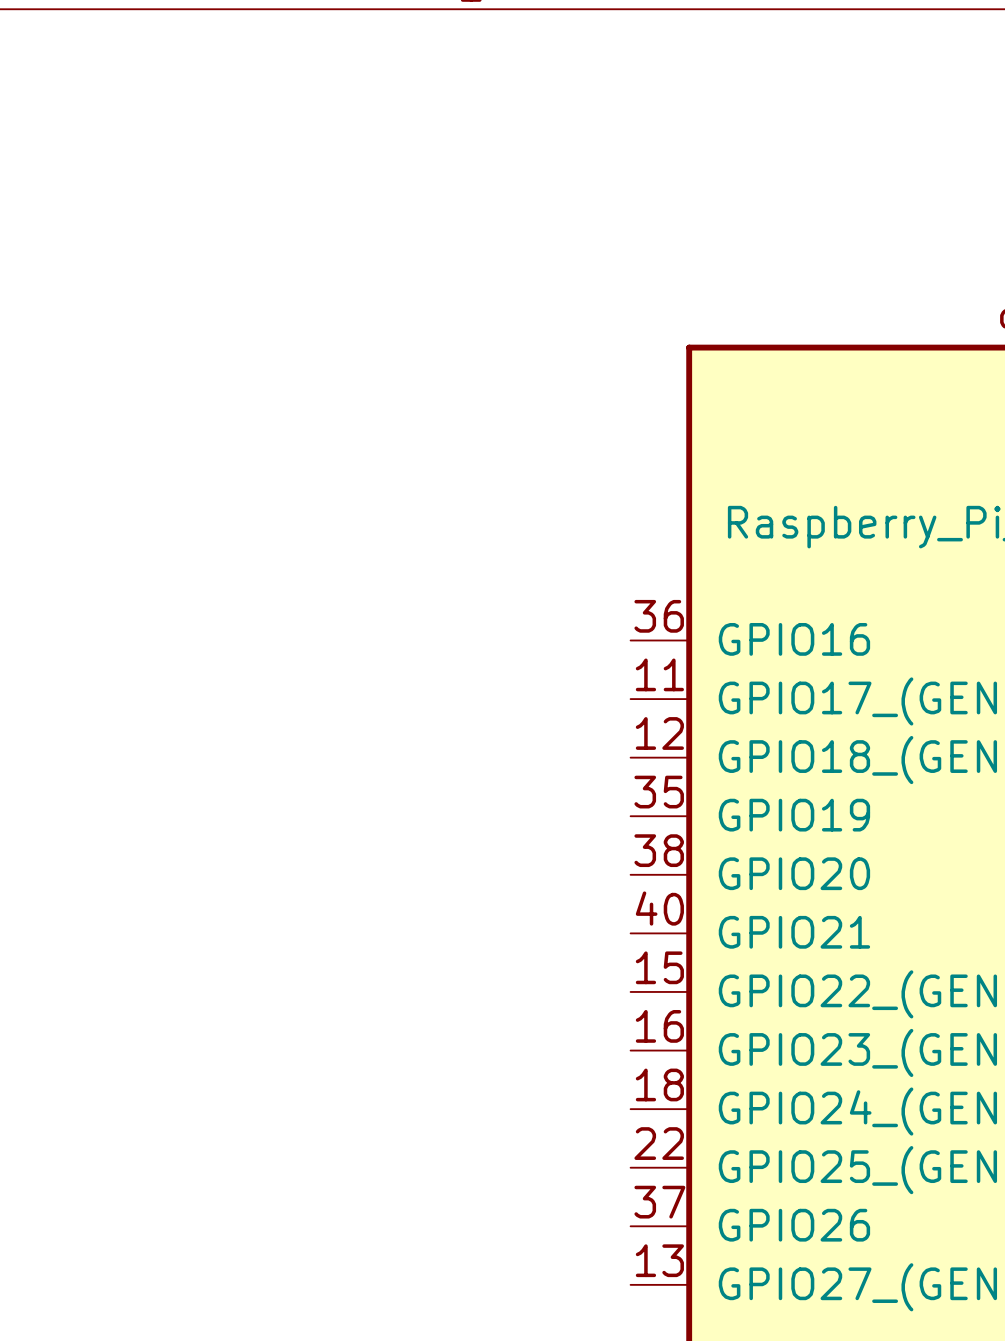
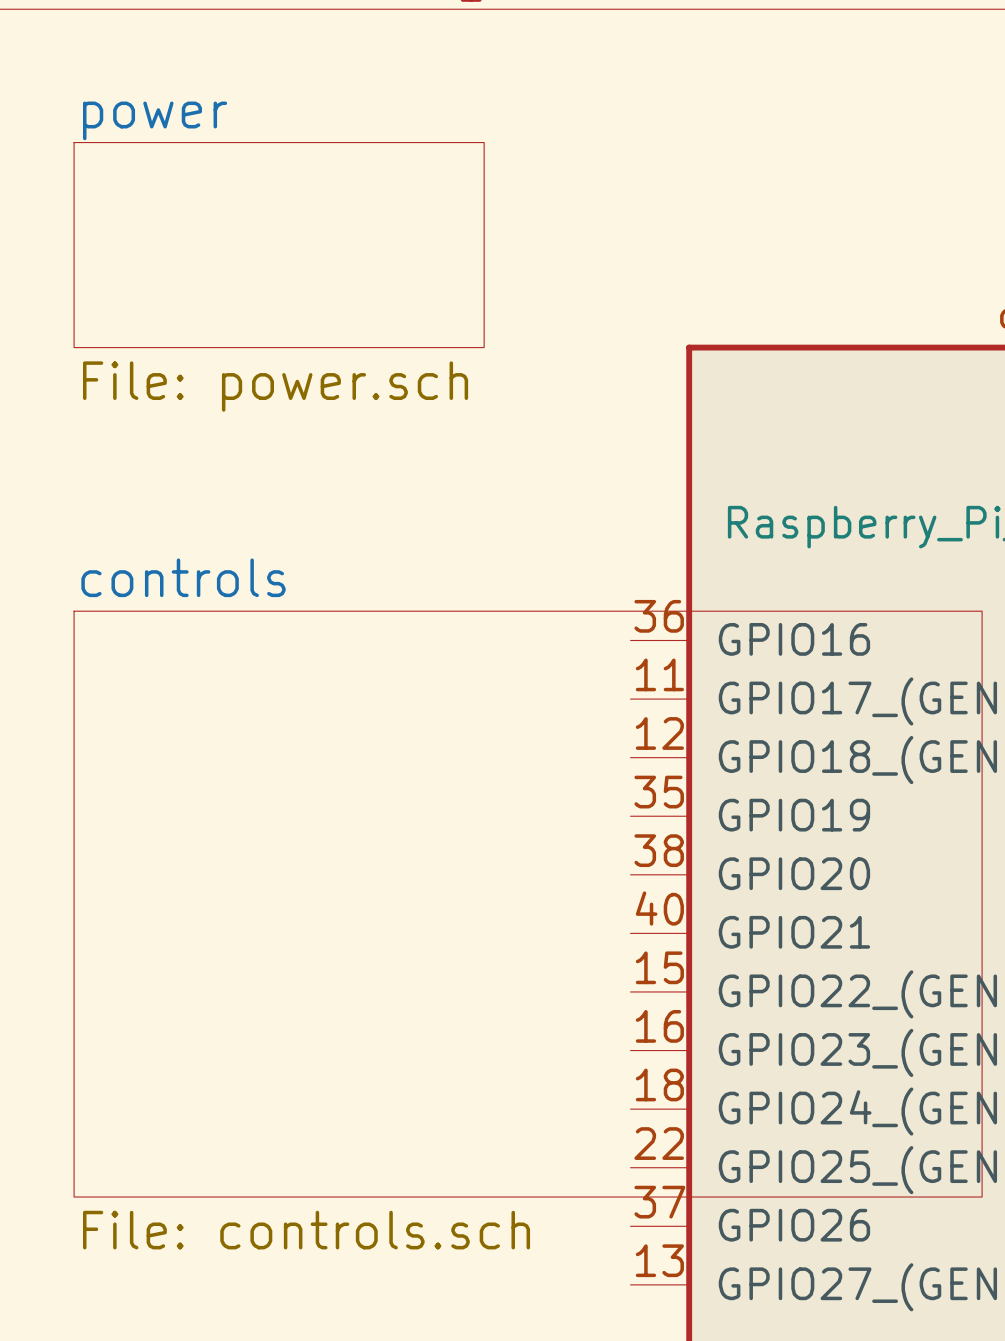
sheet power: none -> File: power.sch (279, 245)
sheet controls: none -> File: controls.sch (528, 904)

